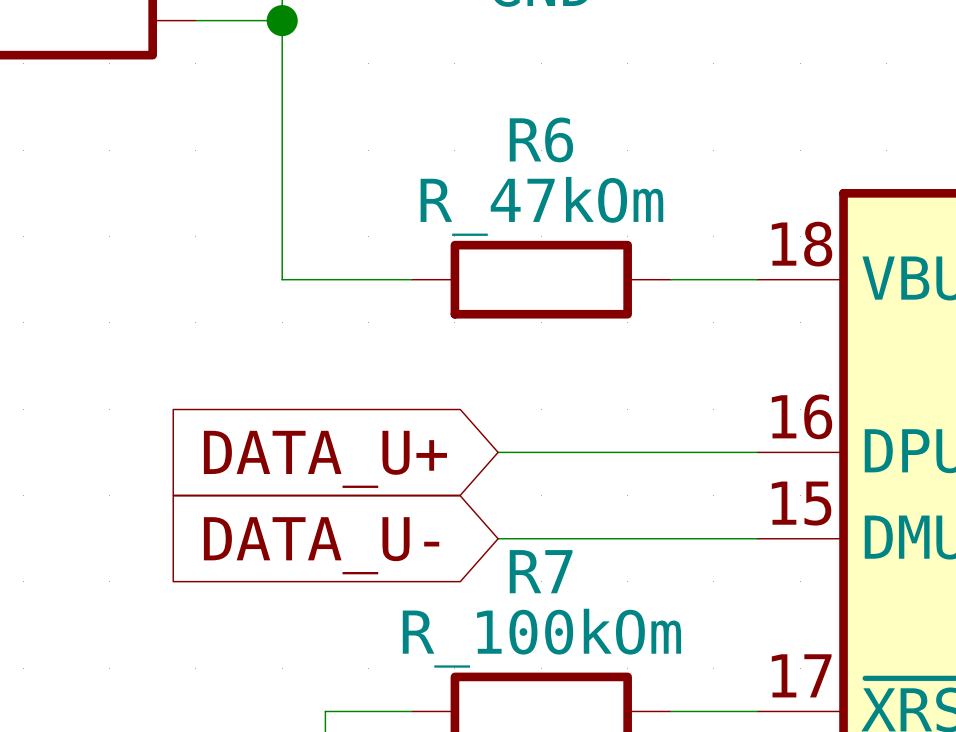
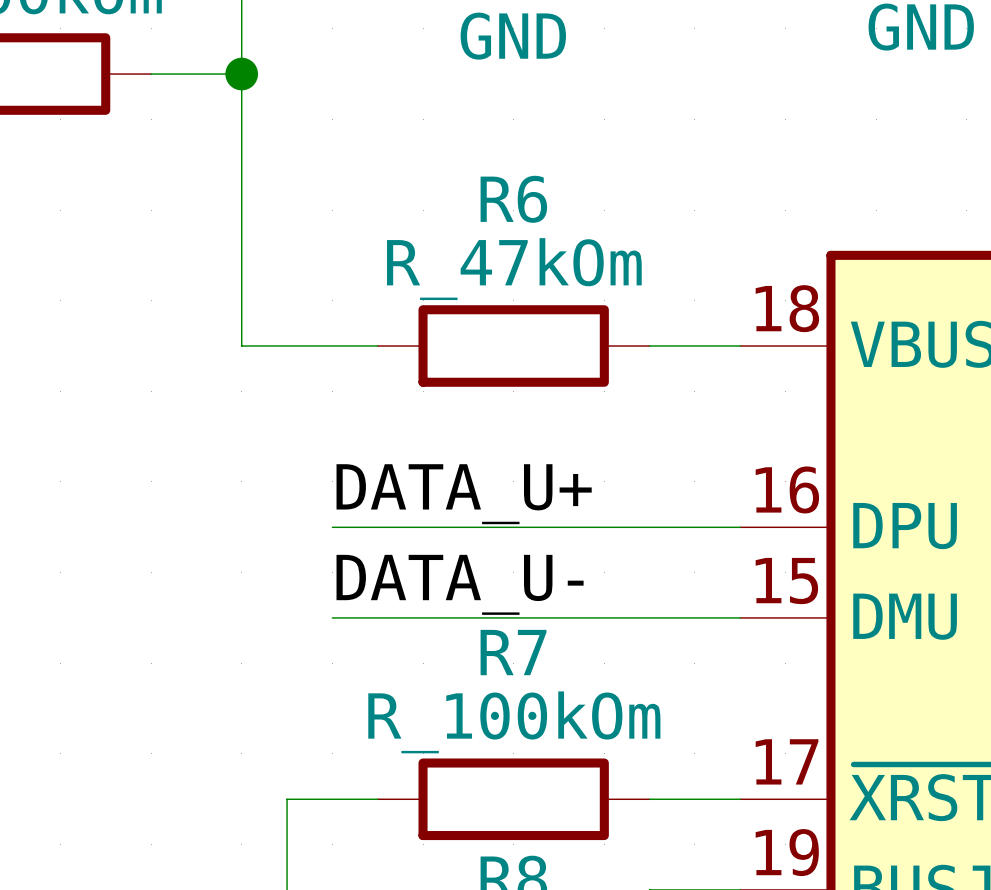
label: none -> DATA_U+ (464, 494)
wire: none -> (332, 527) (468, 527)
global label: DATA_U+ (325, 459) -> none
label: none -> DATA_U- (460, 584)
wire: none -> (332, 617) (468, 617)
global label: DATA_U- (321, 545) -> none

